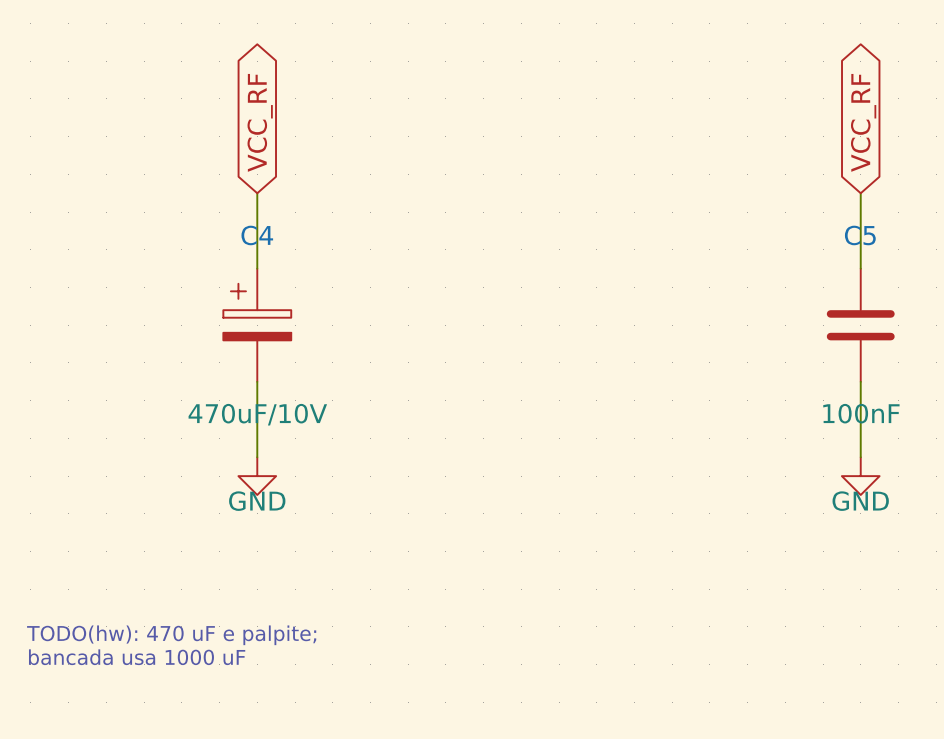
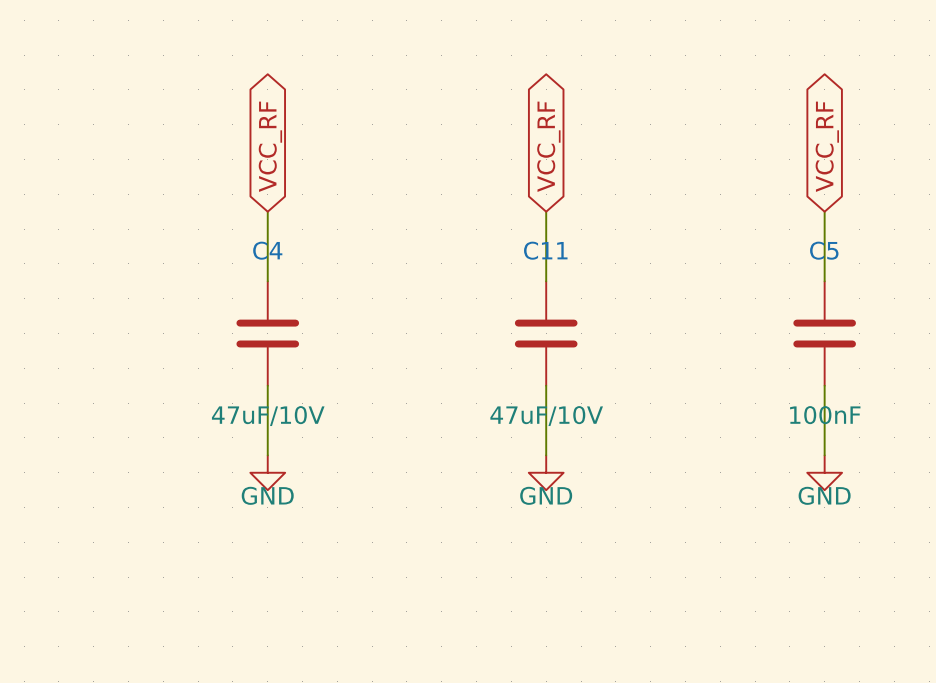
global label: none -> VCC_RF (548, 146)
wire: none -> (546, 211) (546, 281)
C4 symbol: [223, 268, 292, 382] -> [236, 281, 300, 386]
C11: none -> 47uF/10V (546, 333)
wire: none -> (546, 385) (546, 455)
C4 value: 470uF/10V (257, 414) -> 47uF/10V (268, 416)
power symbol: none -> GND (546, 472)
text: TODO(hw): 470 uF e palpite; (171, 635) -> none
text: bancada usa 1000 uF (137, 657) -> none

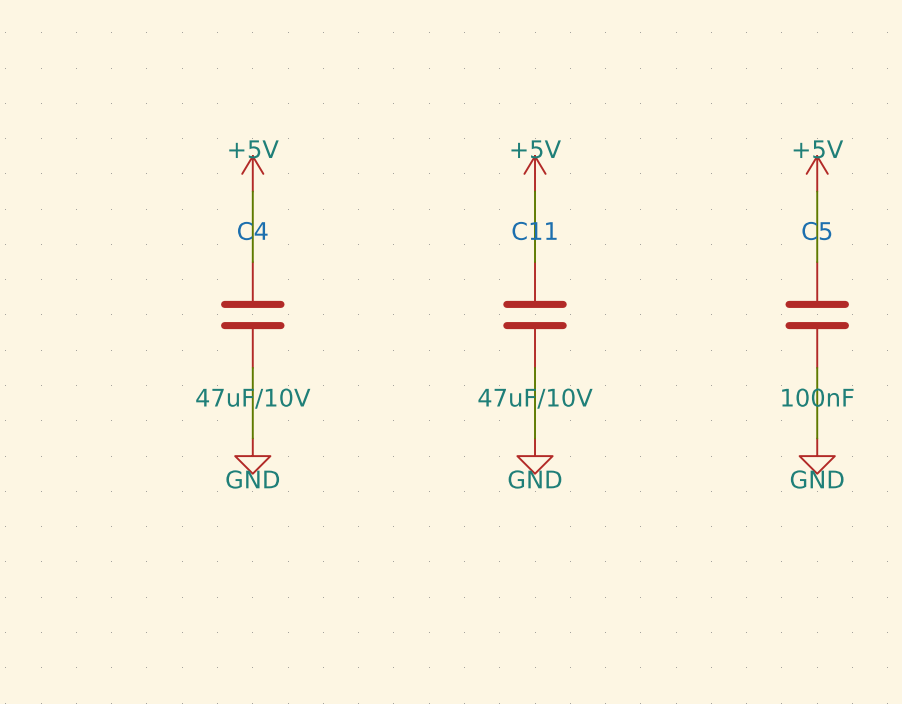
global label: VCC_RF (270, 146) -> none
global label: VCC_RF (548, 146) -> none
global label: VCC_RF (827, 146) -> none
power symbol: none -> +5V (252, 173)
power symbol: none -> +5V (535, 173)
power symbol: none -> +5V (817, 173)

